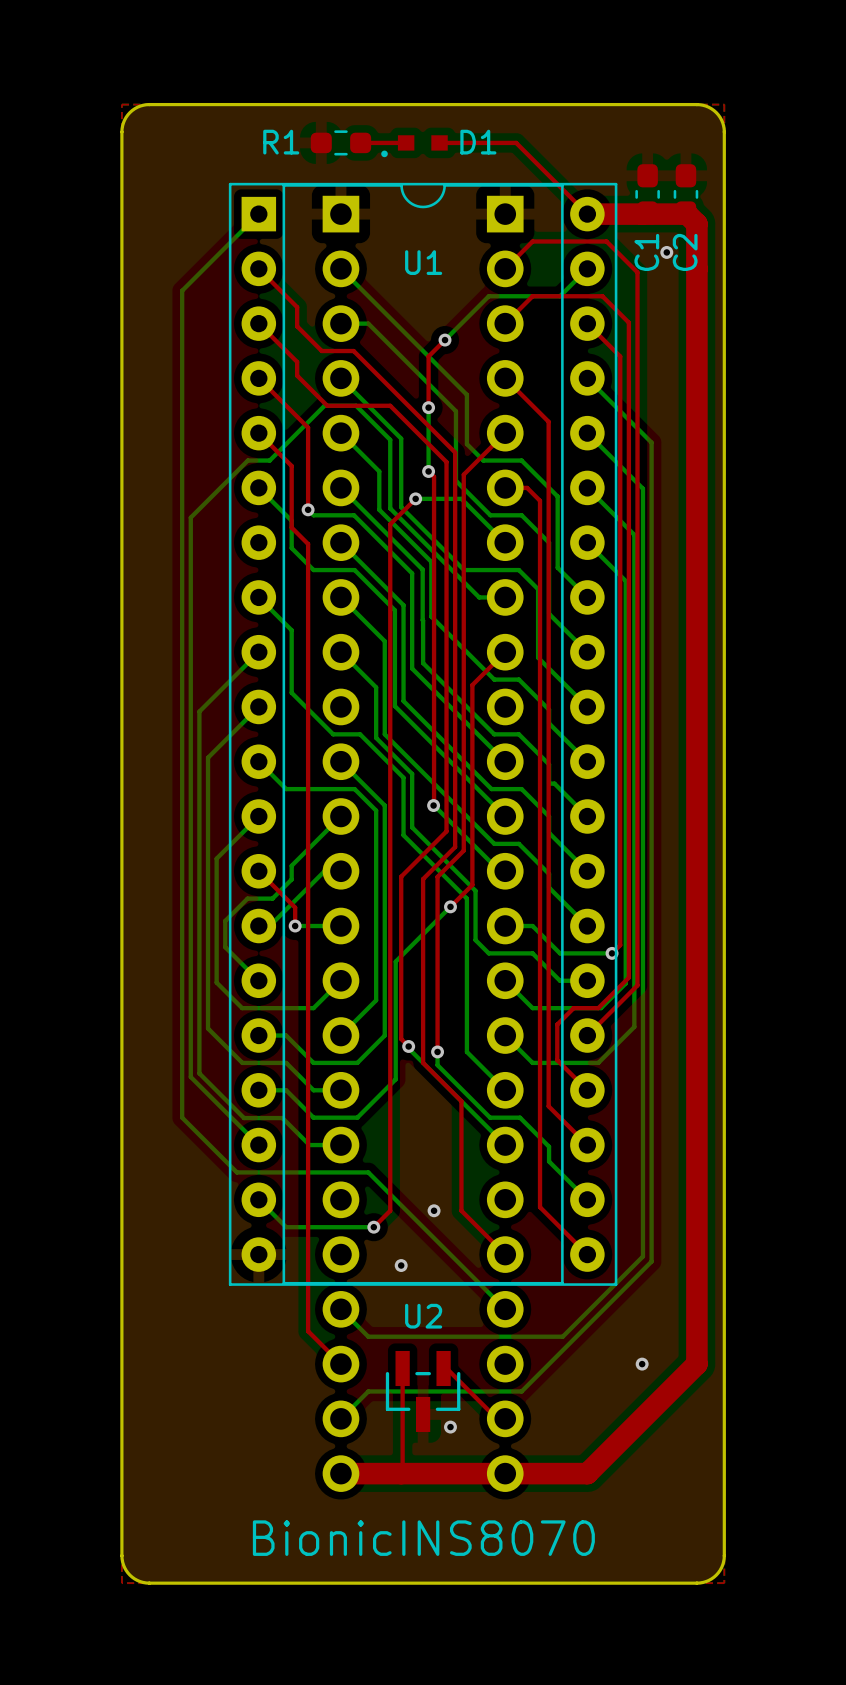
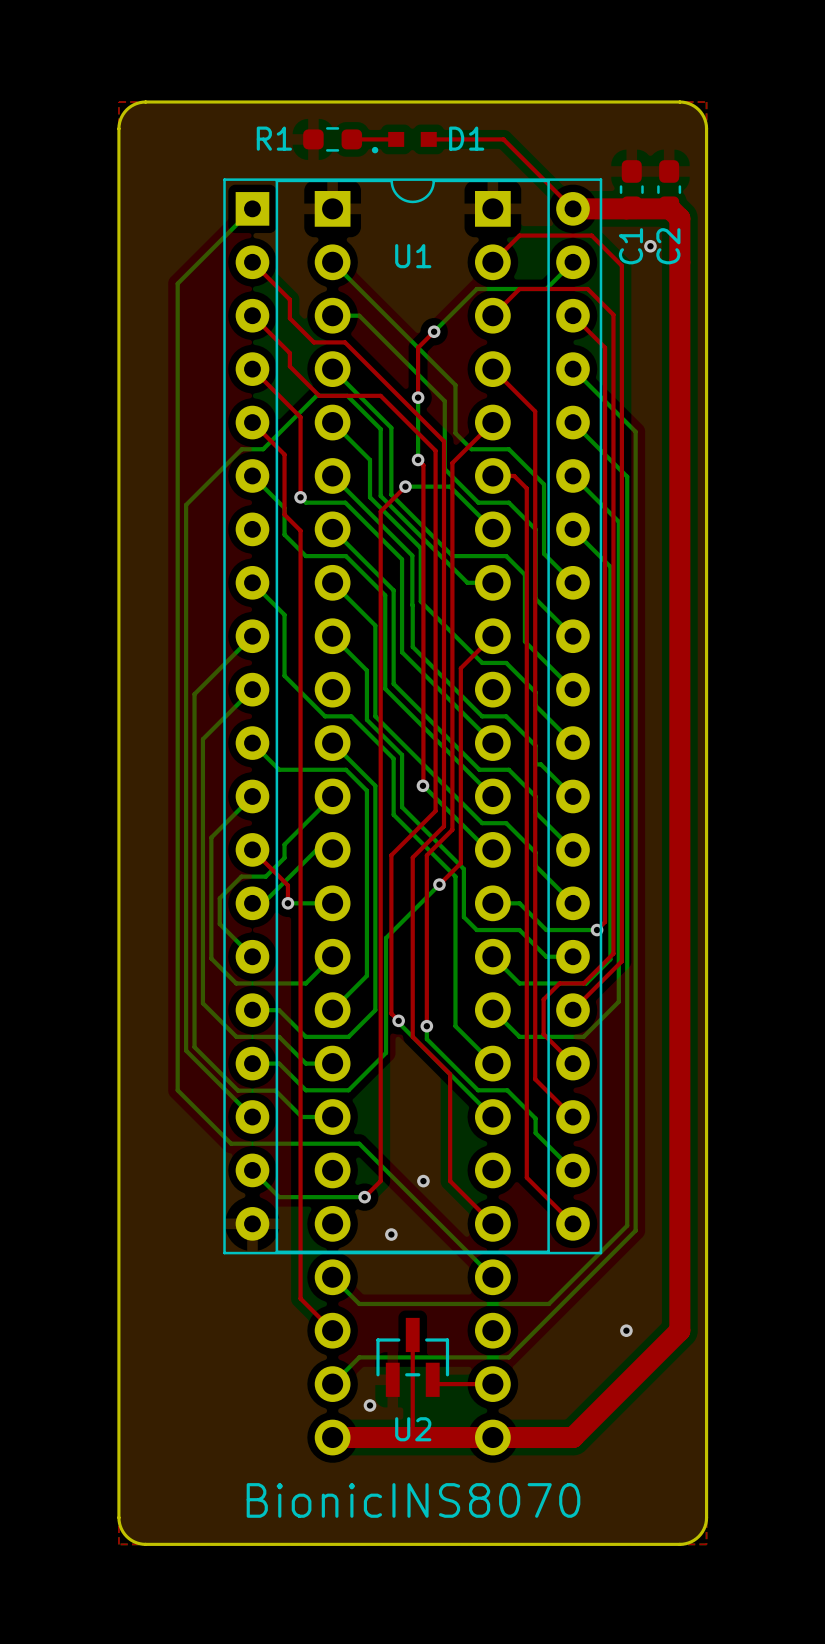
top track: (402, 1368) (401, 1473) -> none
top track: none -> (412, 1334) (412, 1437)
top track: (443, 1368) (446, 1368) (497, 1418) -> (432, 1379) (437, 1384) (484, 1384)
U2 rotation: 0° (423, 1391) -> 180° (412, 1357)
via position: (450, 1427) -> (370, 1405)

